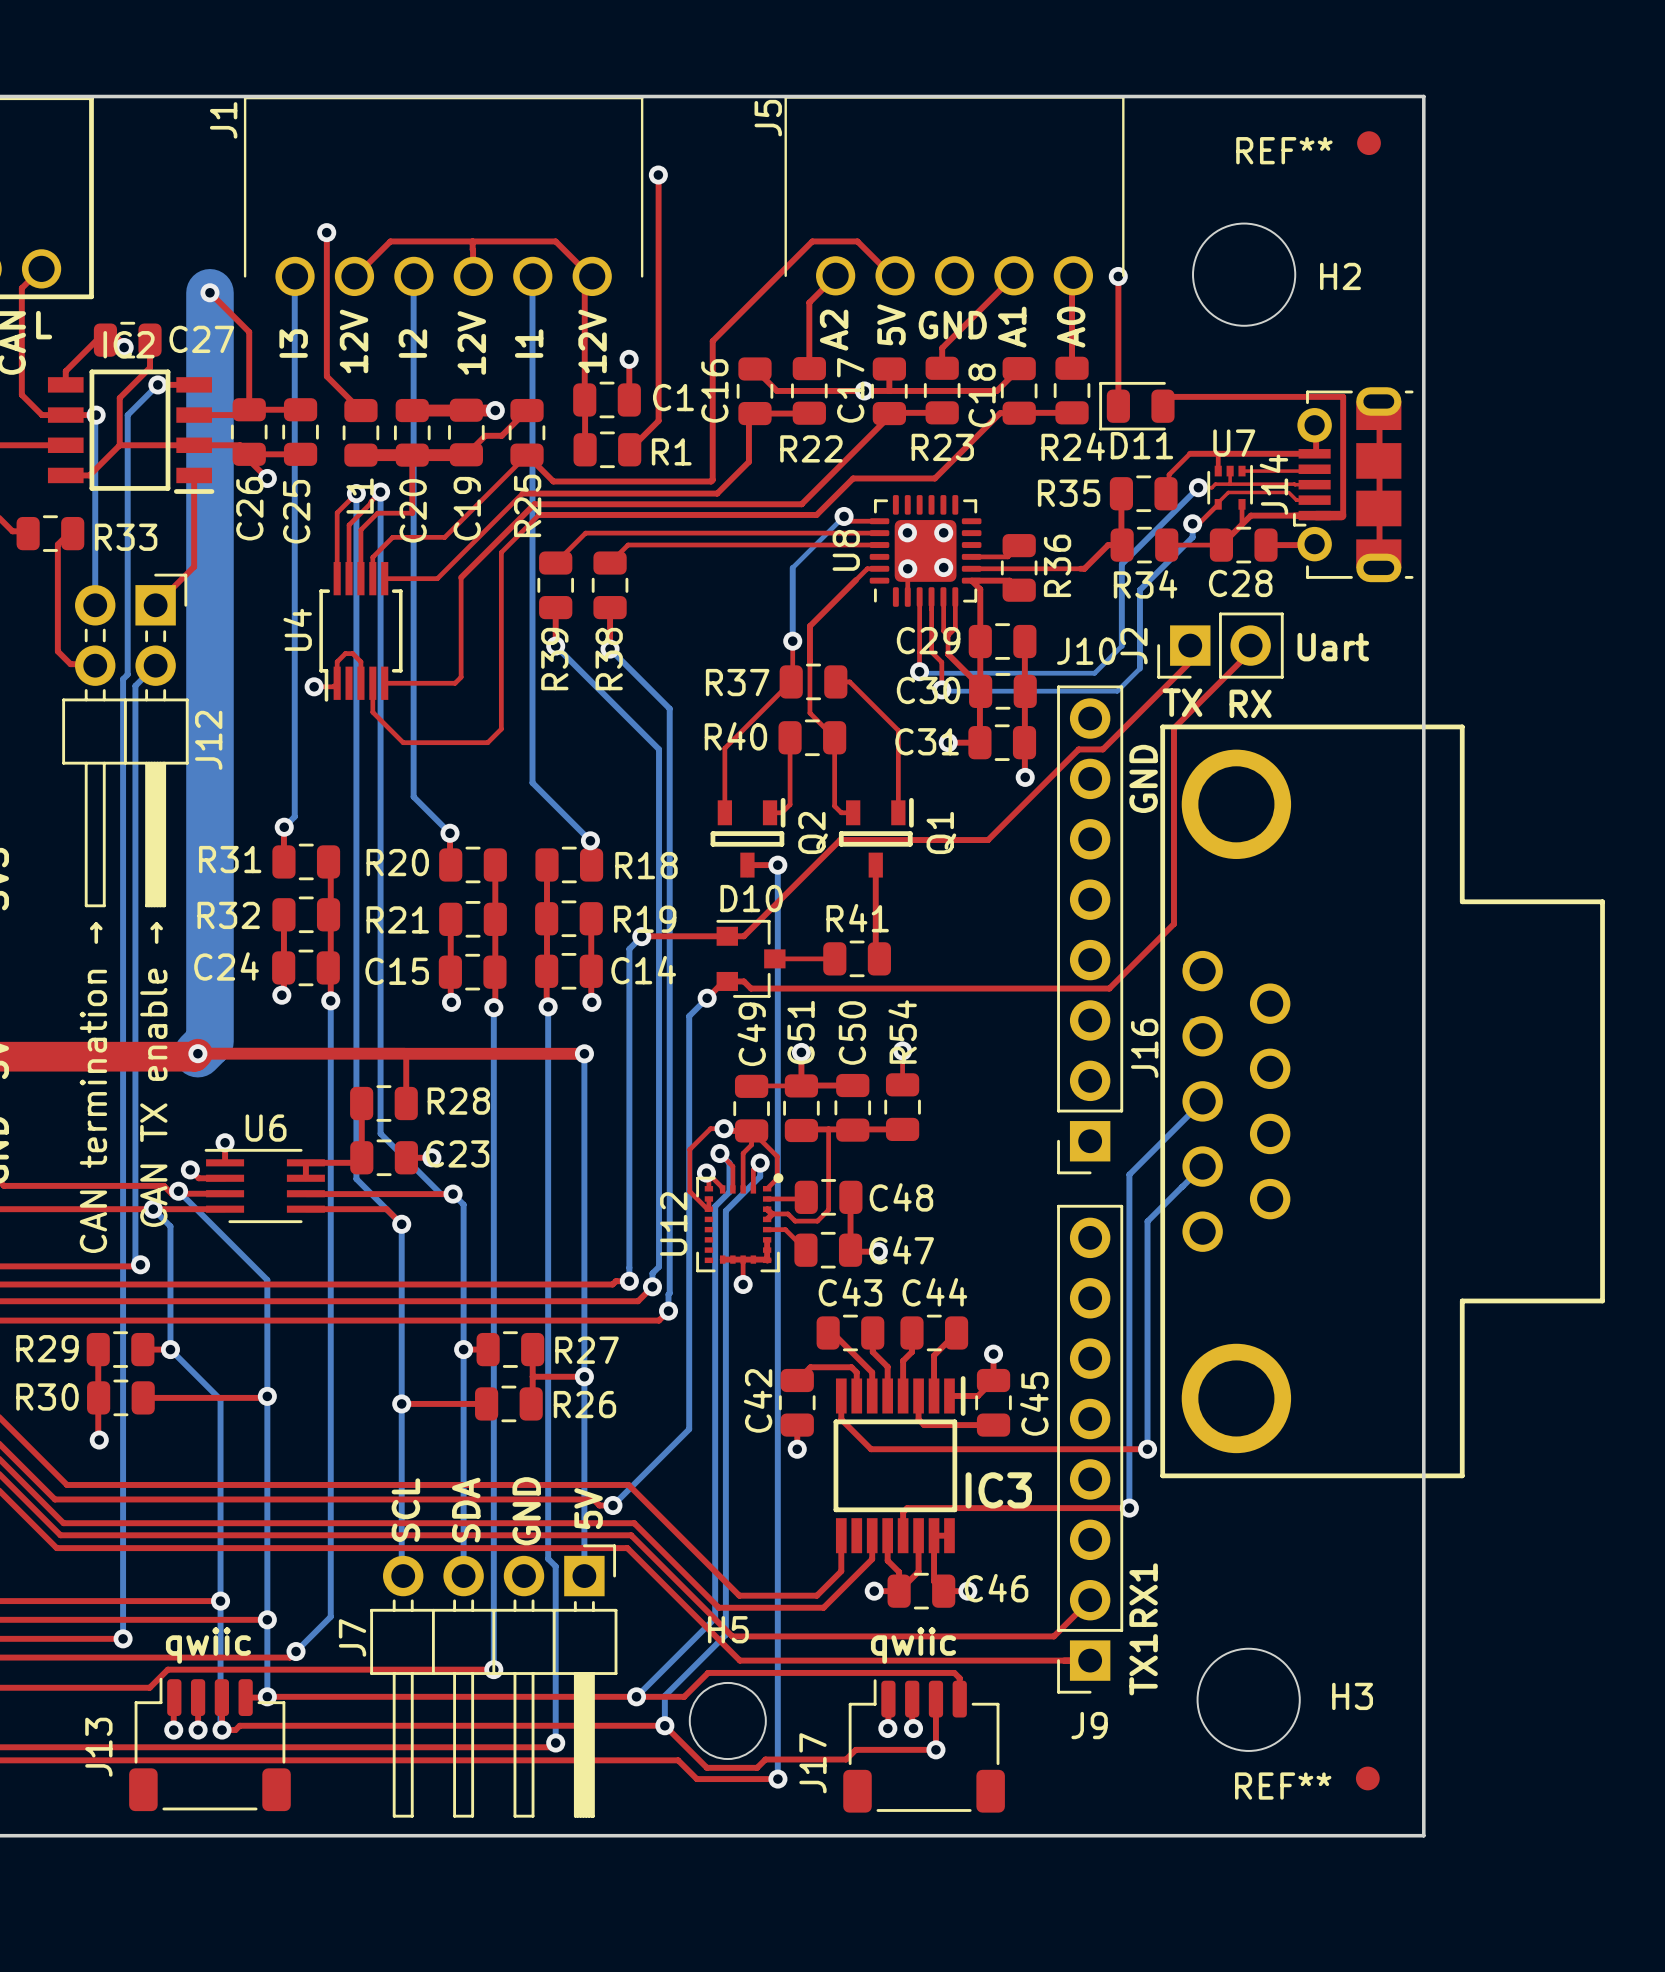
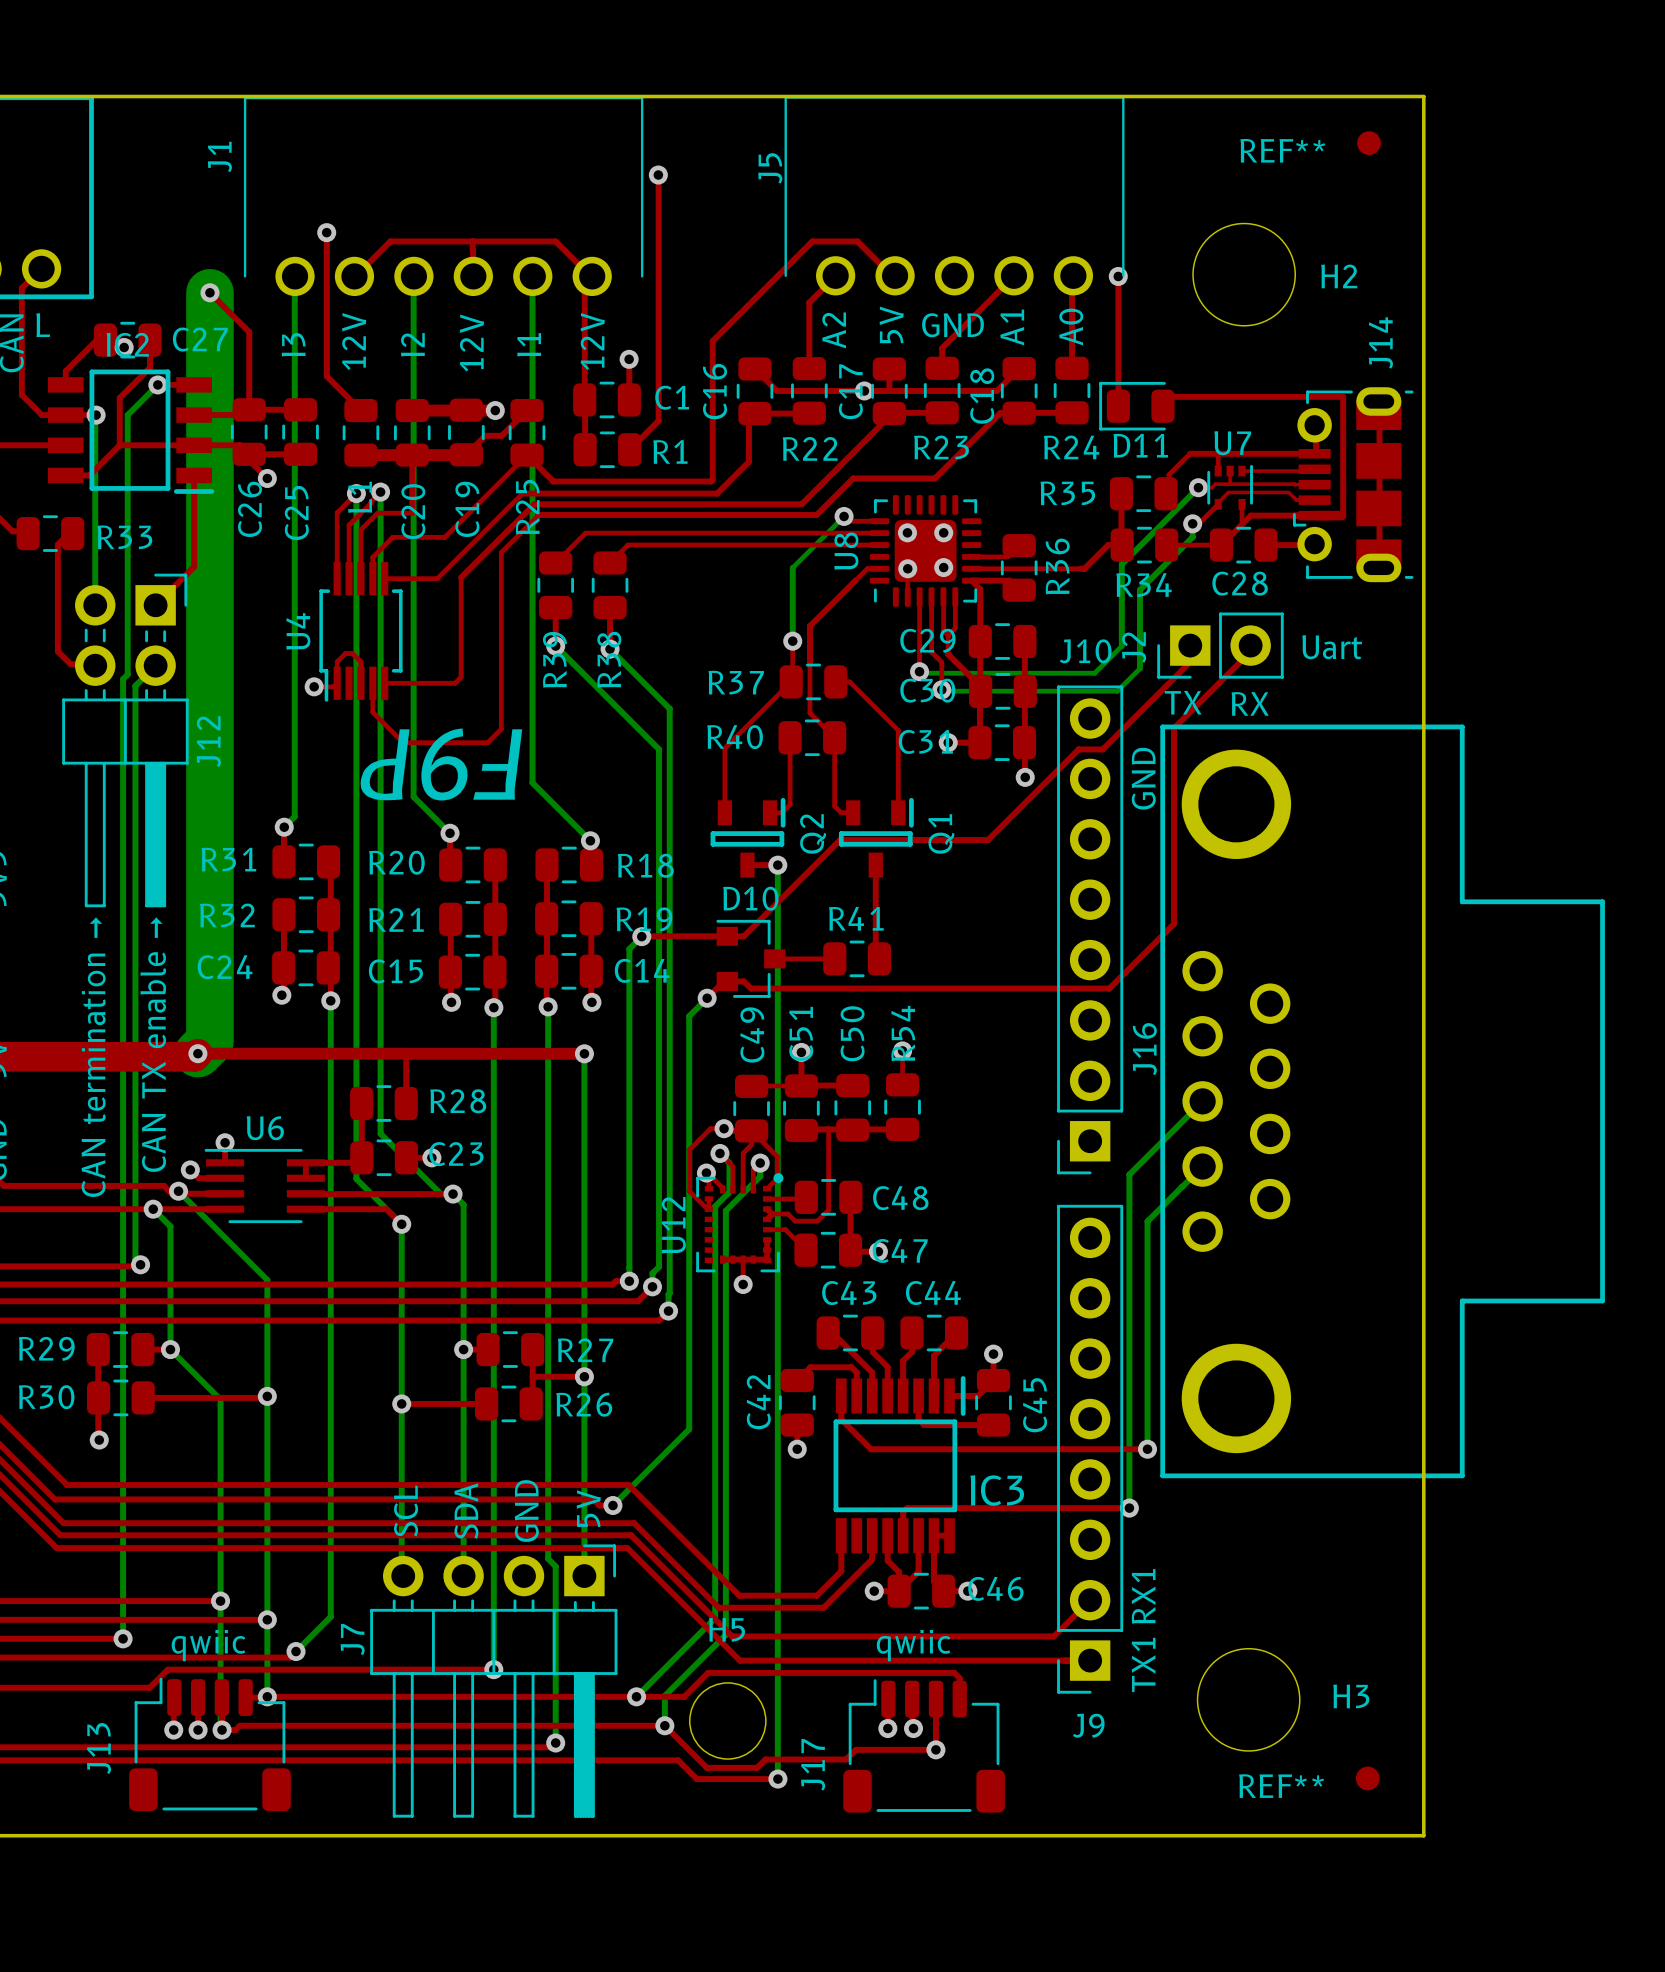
J5 name position: J5 (768, 118) -> J5 (770, 168)
J1 name position: J1 (223, 120) -> J1 (219, 157)
J14 name position: J14 (1273, 484) -> J14 (1380, 342)
text: none -> F9P (441, 764)

